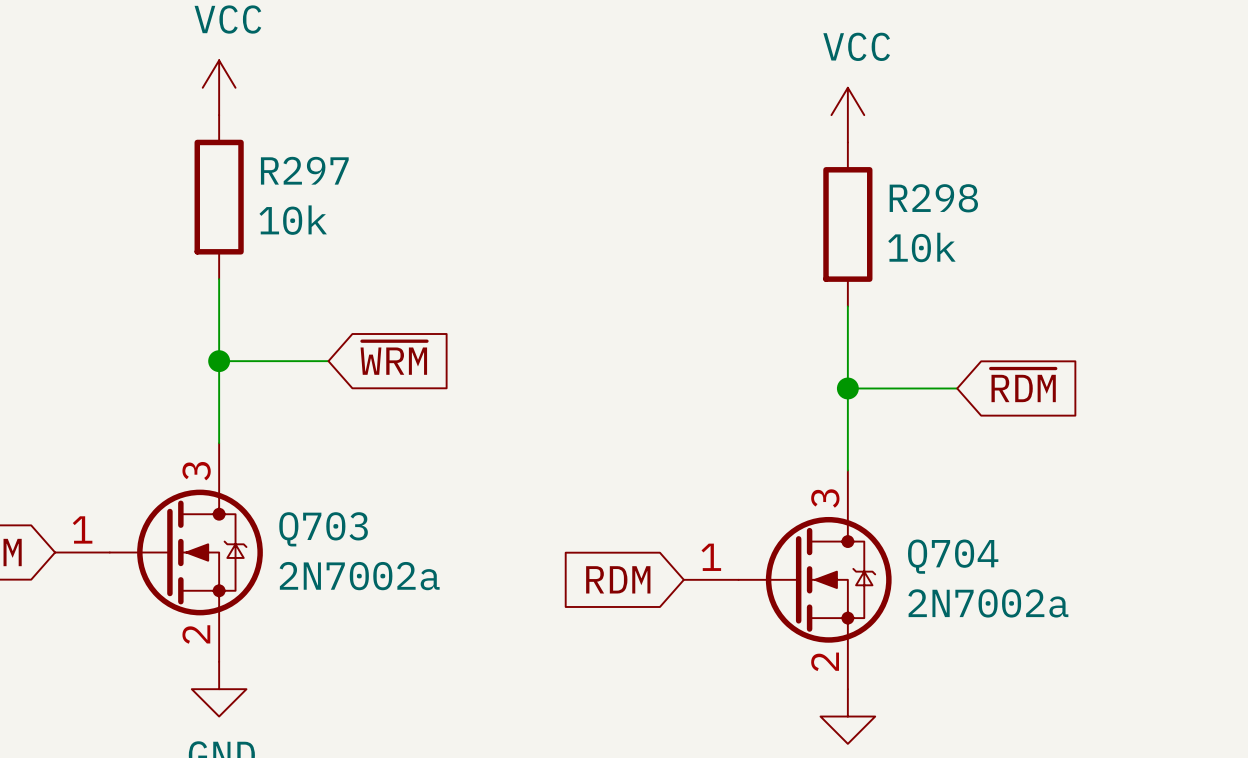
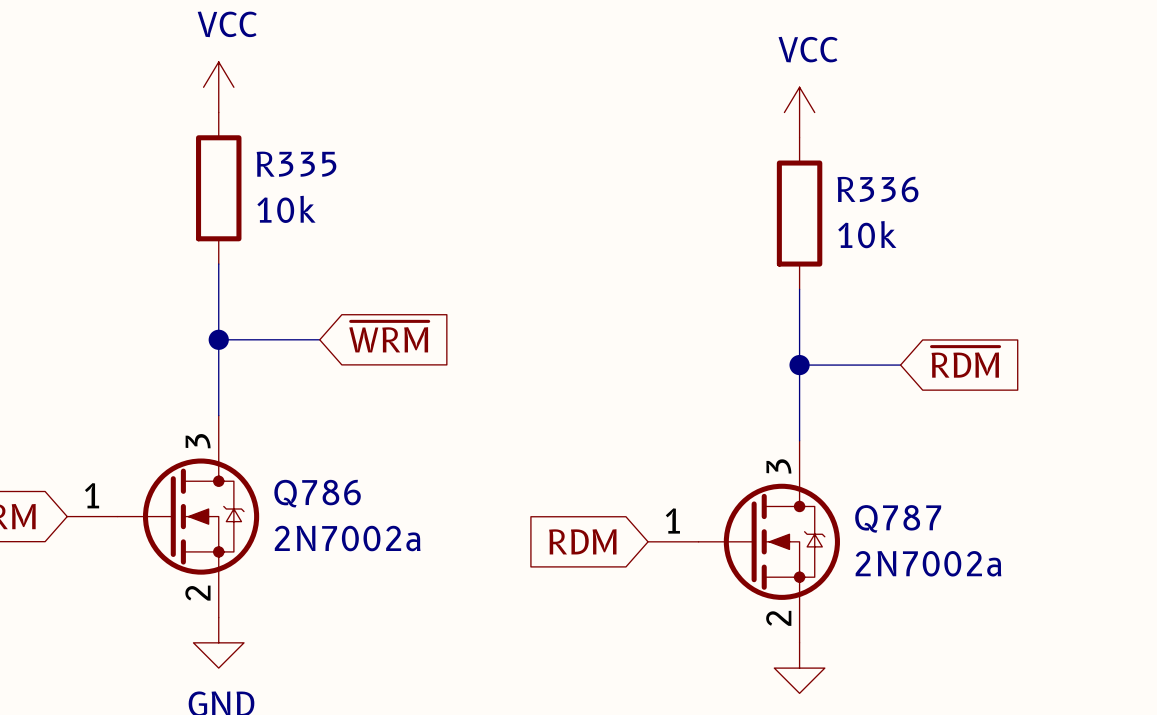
R297 name: R297 (304, 170) -> R335 (296, 164)
R298 name: R298 (933, 198) -> R336 (877, 189)
Q703 name: Q703 (323, 529) -> Q786 (317, 493)
Q704 name: Q704 (953, 556) -> Q787 (898, 518)

